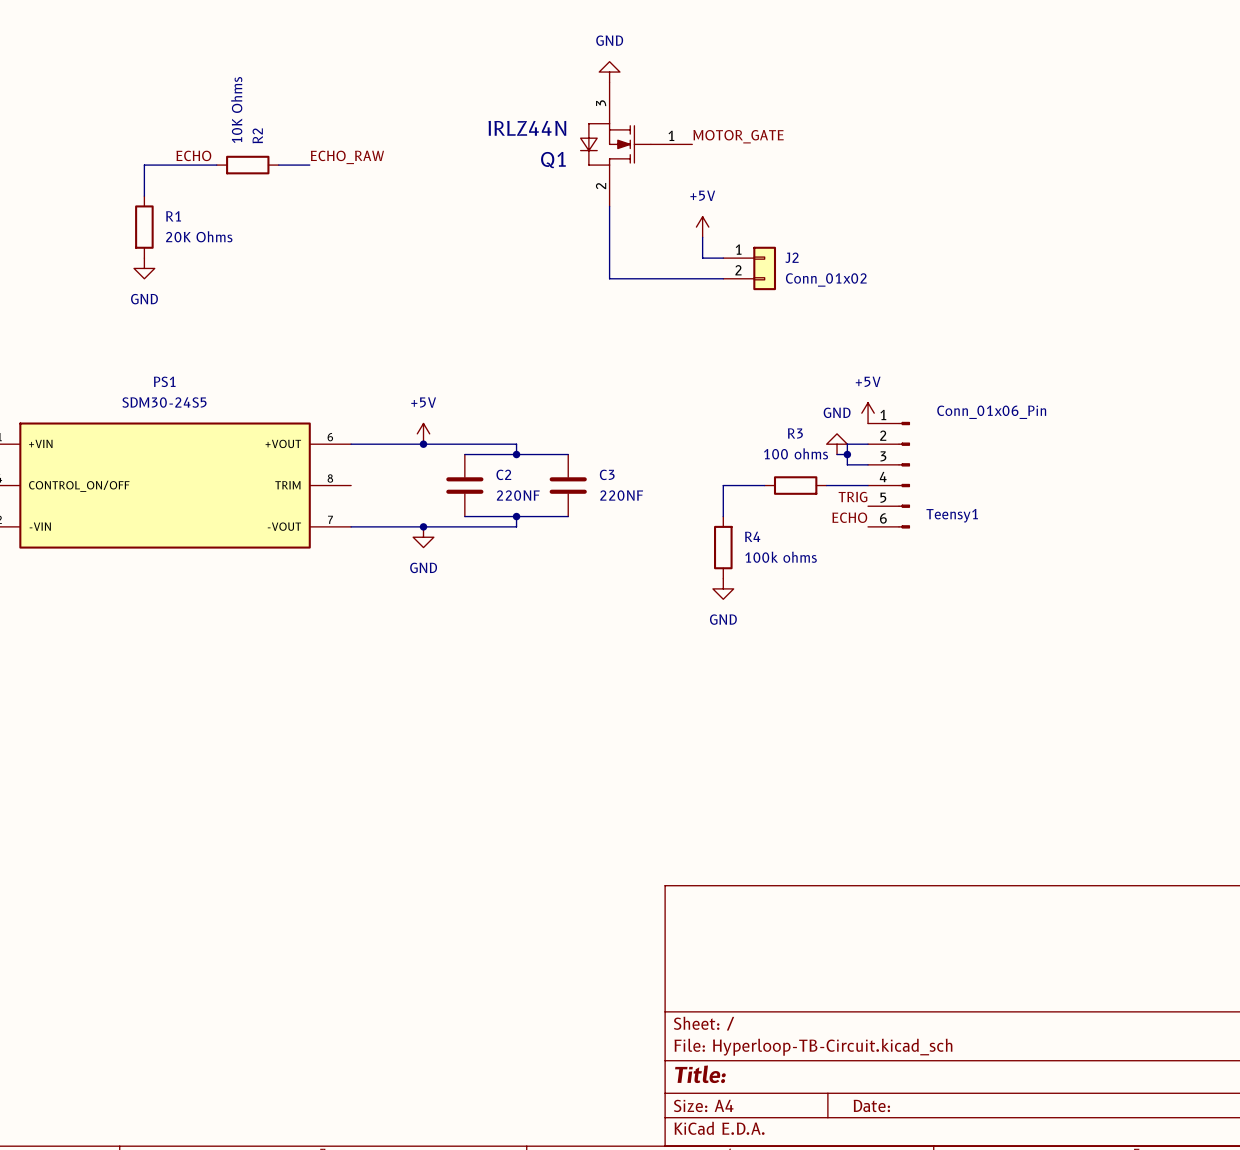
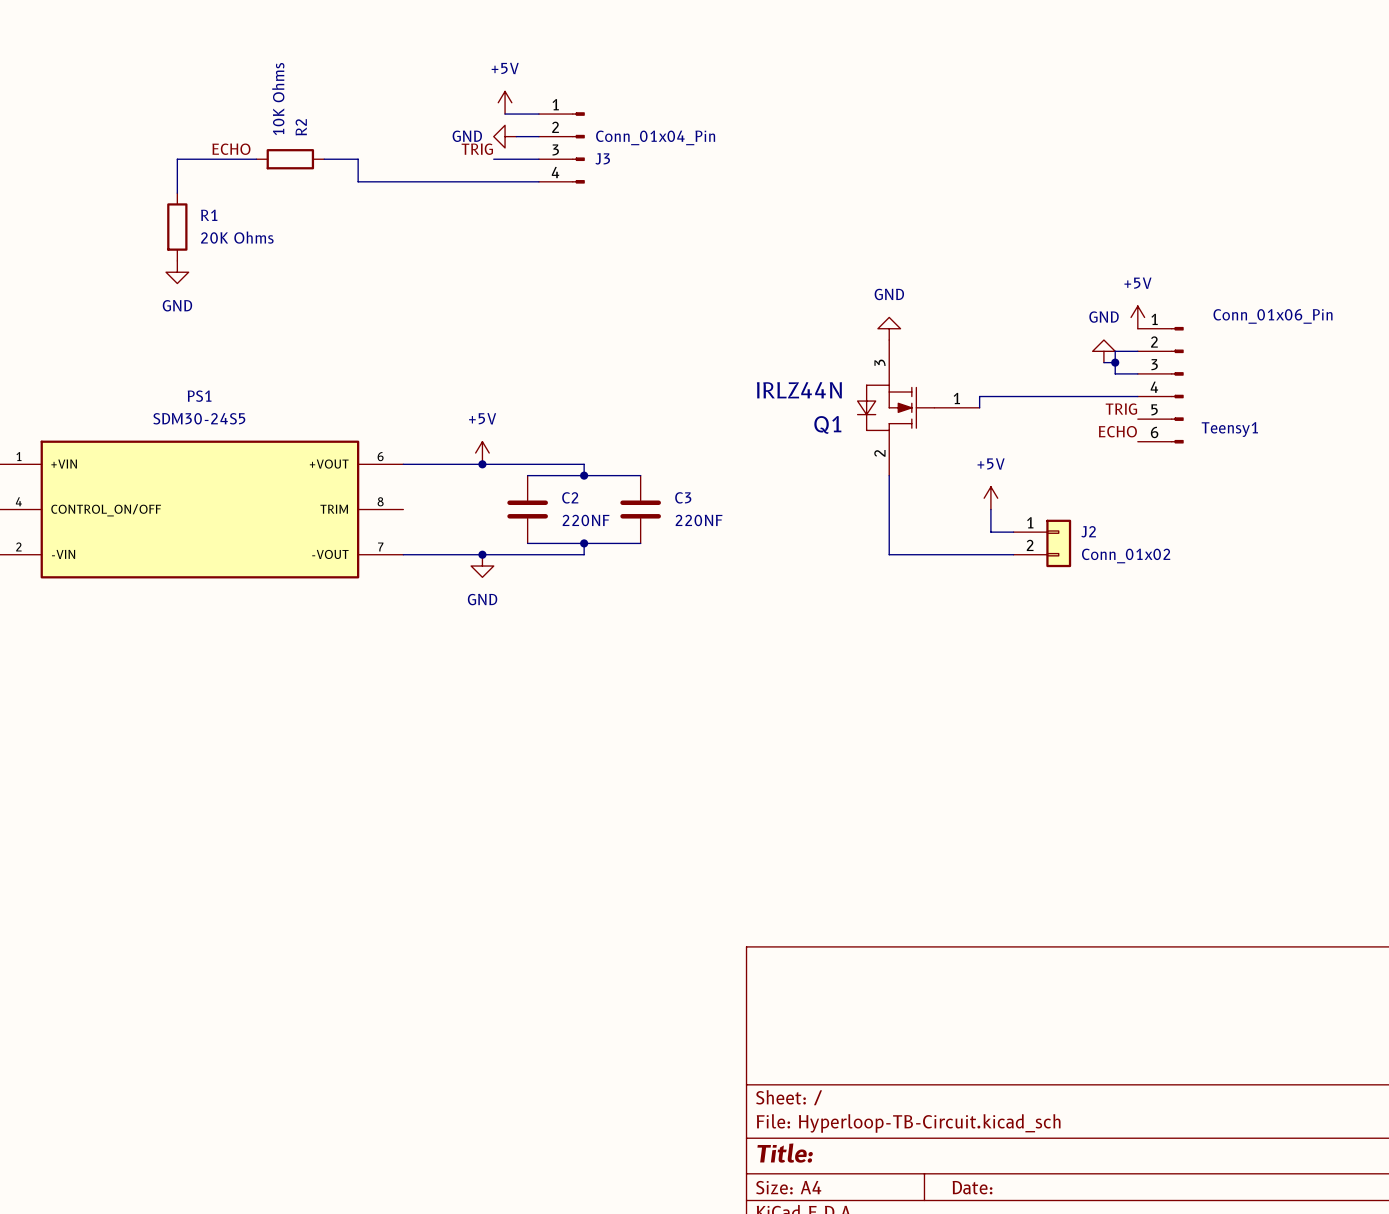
power symbol: GND (609, 72) -> none
power symbol: none -> +5V (505, 102)
wire: none -> (505, 114) (538, 114)
label: MOTOR_GATE (738, 136) -> none
power symbol: none -> GND (505, 136)
wire: none -> (516, 136) (538, 136)
Q1 position: (636, 144) -> (918, 407)
J3: none -> Conn_01x04_Pin (561, 147)
label: none -> TRIG (477, 149)
label: ECHO_RAW (347, 157) -> none
wire: none -> (358, 159) (358, 181) (538, 181)
wire: none -> (493, 159) (538, 159)
wire: (609, 206) (609, 278) (723, 278) -> none
power symbol: +5V (702, 227) -> none
wire: (702, 237) (702, 258) (723, 258) -> none
J2 position: (749, 268) -> (1042, 543)
power symbol: none -> +5V (1137, 317)
power symbol: none -> GND (889, 328)
power symbol: none -> GND (1103, 351)
junction: none -> (1115, 362)
wire: none -> (1137, 396) (979, 396) (979, 407)
power symbol position: +5V (868, 413) -> +5V (990, 498)
power symbol: GND (837, 444) -> none
wire: (868, 444) (847, 444) (847, 464) (868, 464) -> (1137, 351) (1115, 351) (1115, 373) (1137, 373)
wire: none -> (889, 475) (889, 554) (1013, 554)
wire: (837, 454) (847, 454) -> (1103, 362) (1115, 362)
junction: (847, 454) -> none
Teensy1 position: (889, 475) -> (1160, 385)
wire: (764, 485) (723, 485) (723, 516) -> none
R3: 100 ohms (795, 485) -> none
wire: (826, 485) (868, 485) -> none
wire: none -> (990, 509) (990, 532) (1013, 532)
label position: TRIG (853, 497) -> TRIG (1121, 409)
label position: ECHO (849, 517) -> ECHO (1117, 431)
R4: 100k ohms (723, 547) -> none
power symbol: GND (723, 588) -> none

